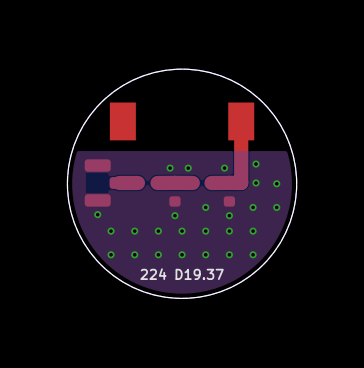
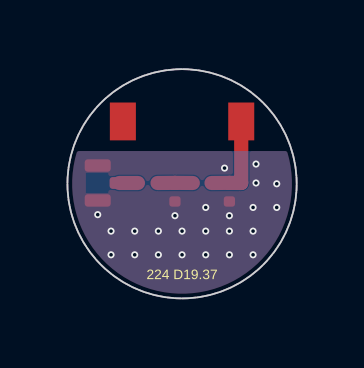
via: (170, 168) -> none
via: (188, 168) -> none

